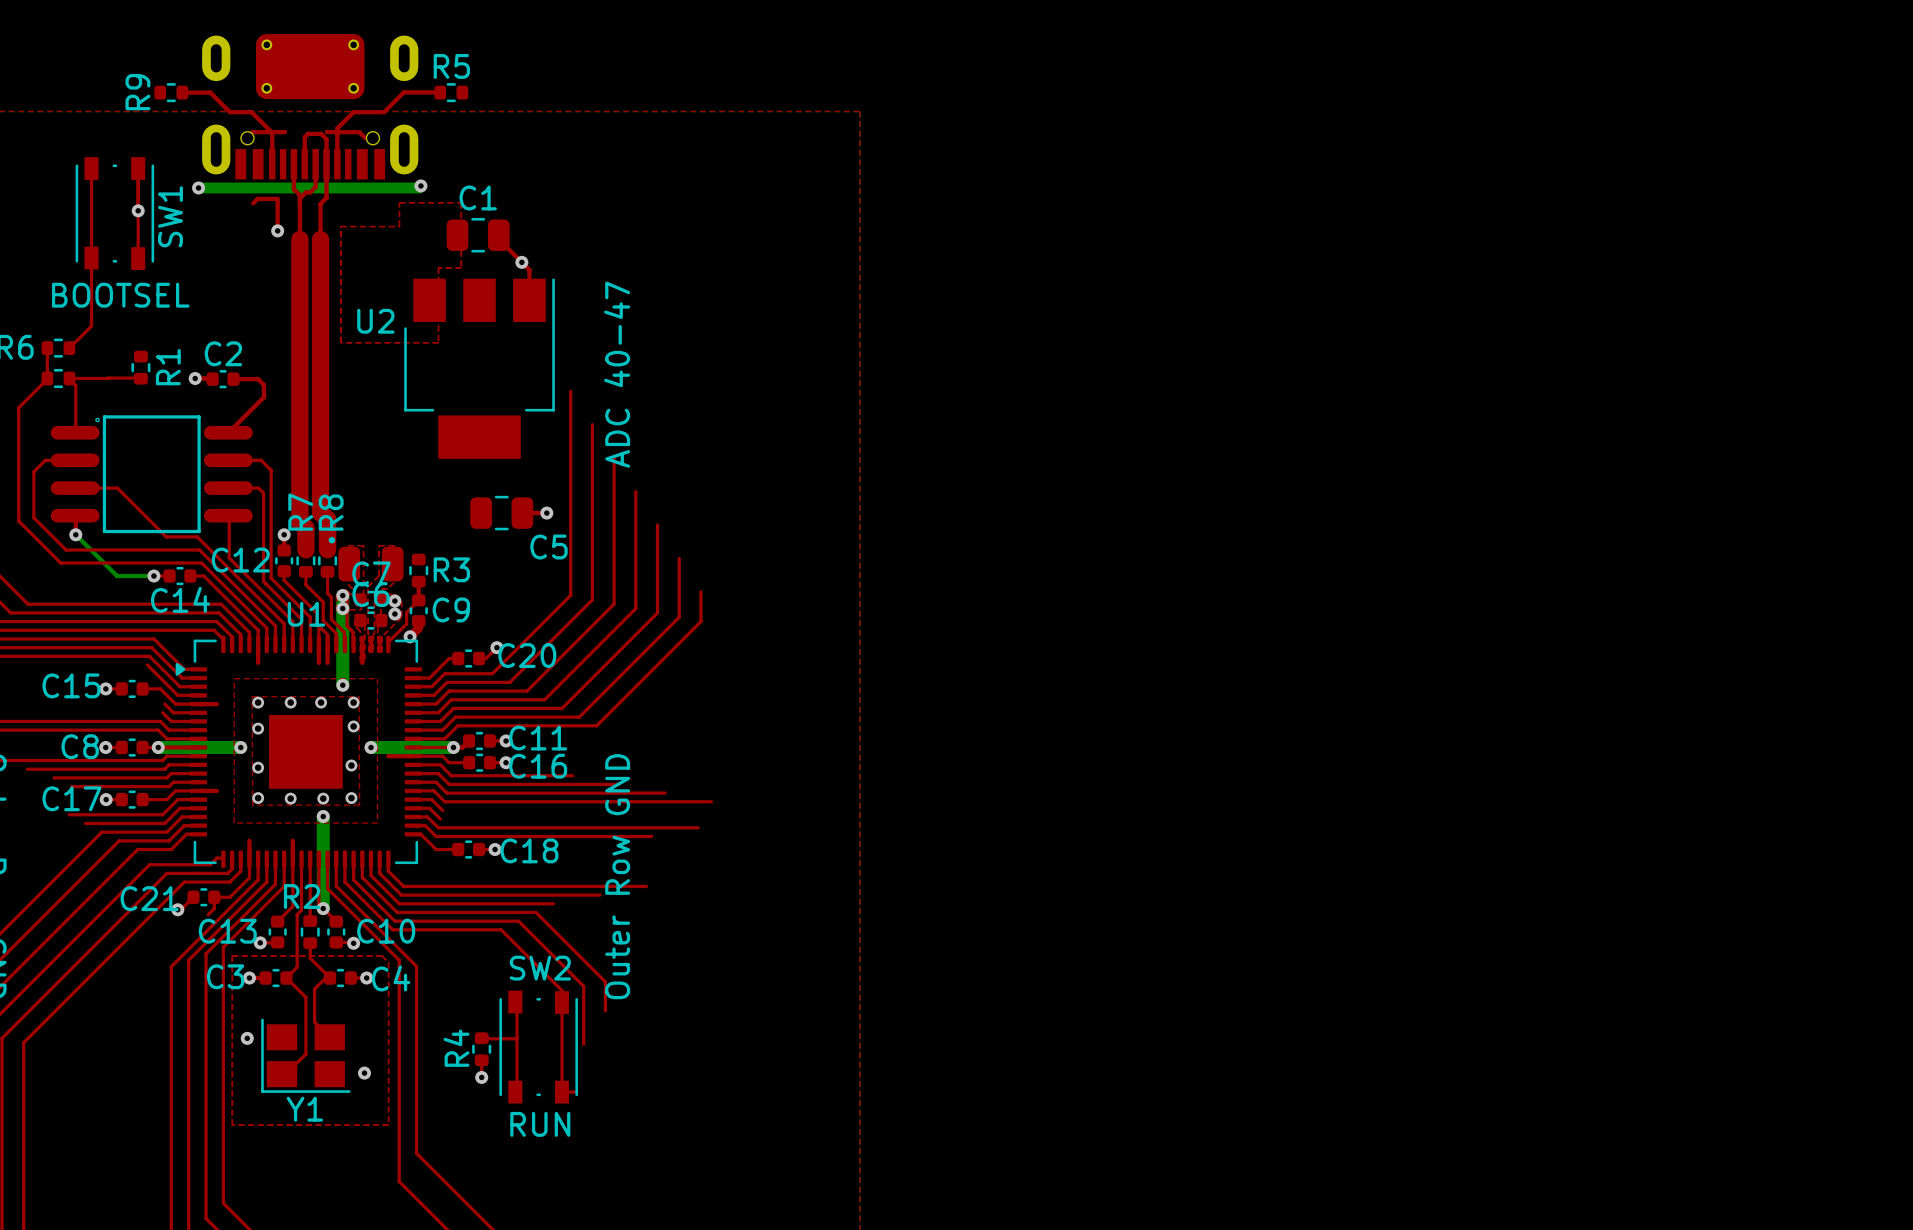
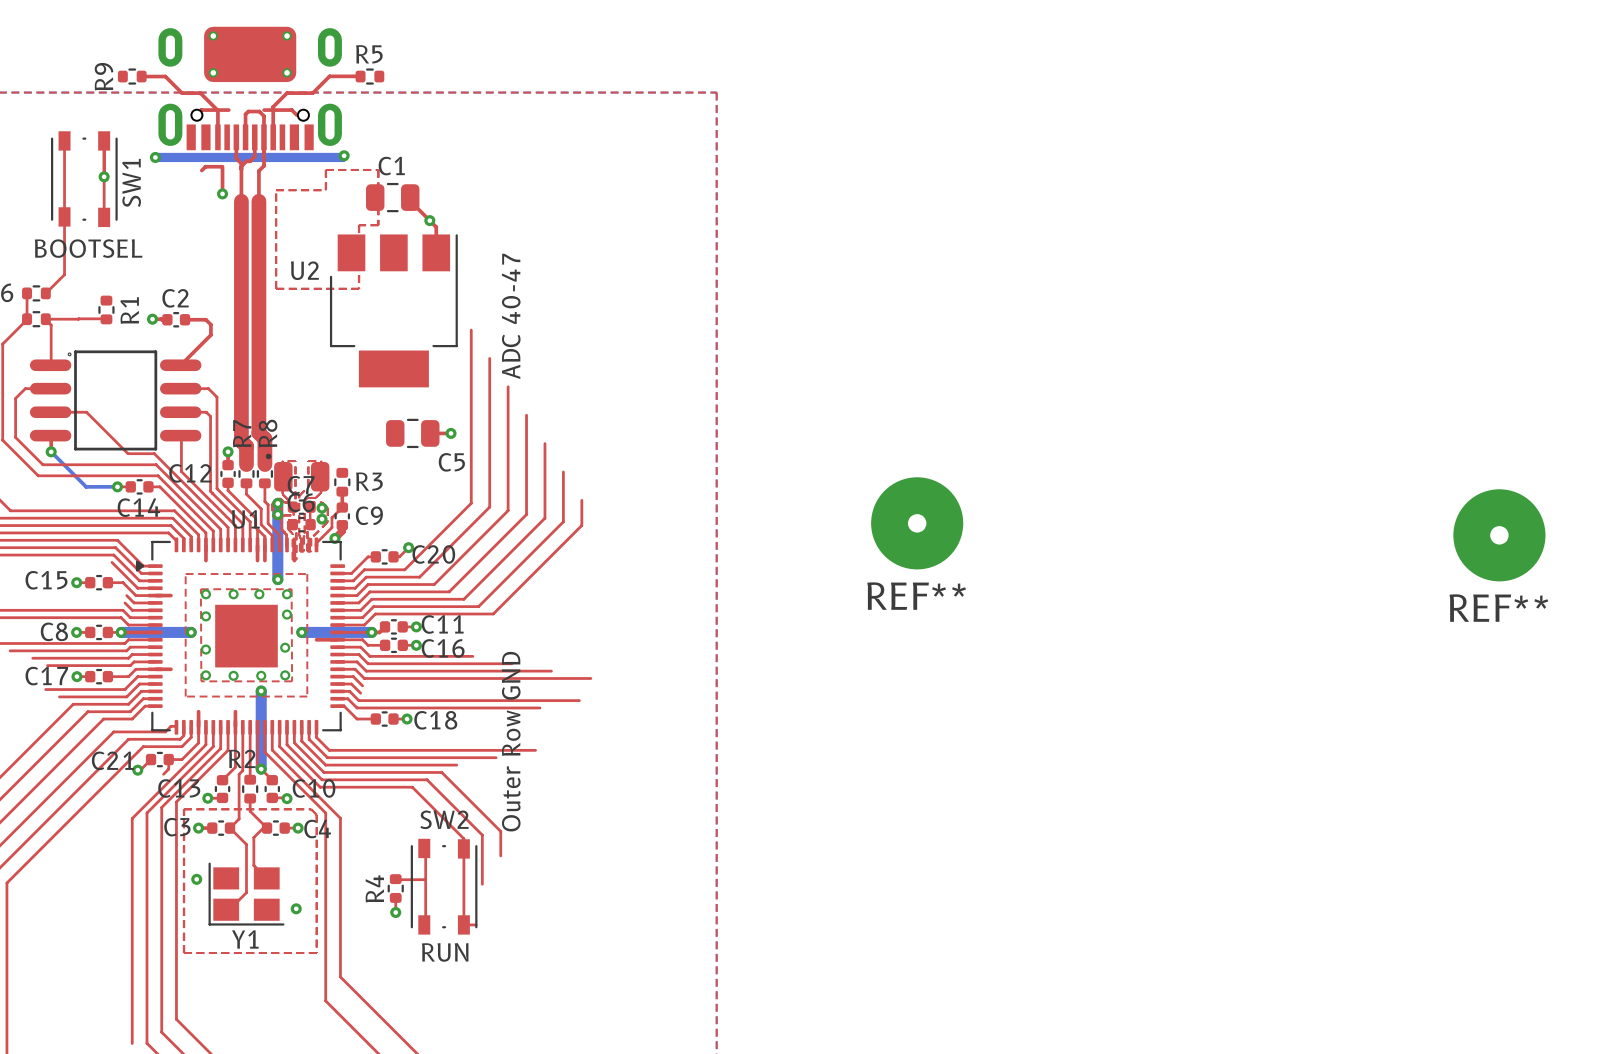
REF**: none -> (917, 523)
REF**: none -> (1499, 535)

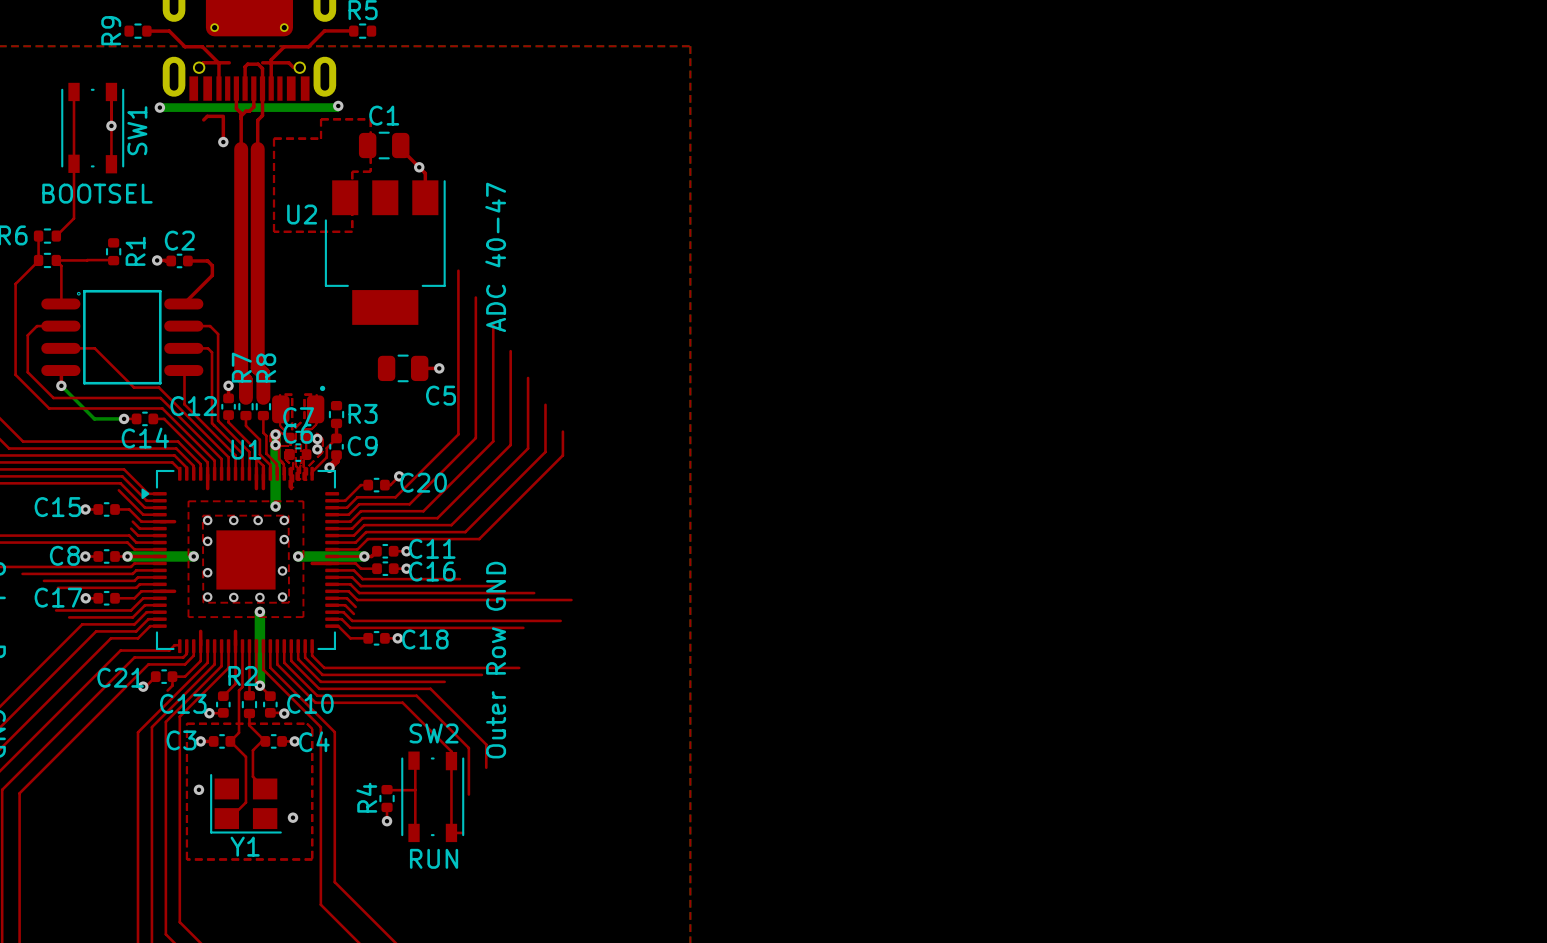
part footprint: [265, 453, 330, 492] -> [272, 385, 326, 424]
REF**: (917, 523) -> none
REF**: (1499, 535) -> none

